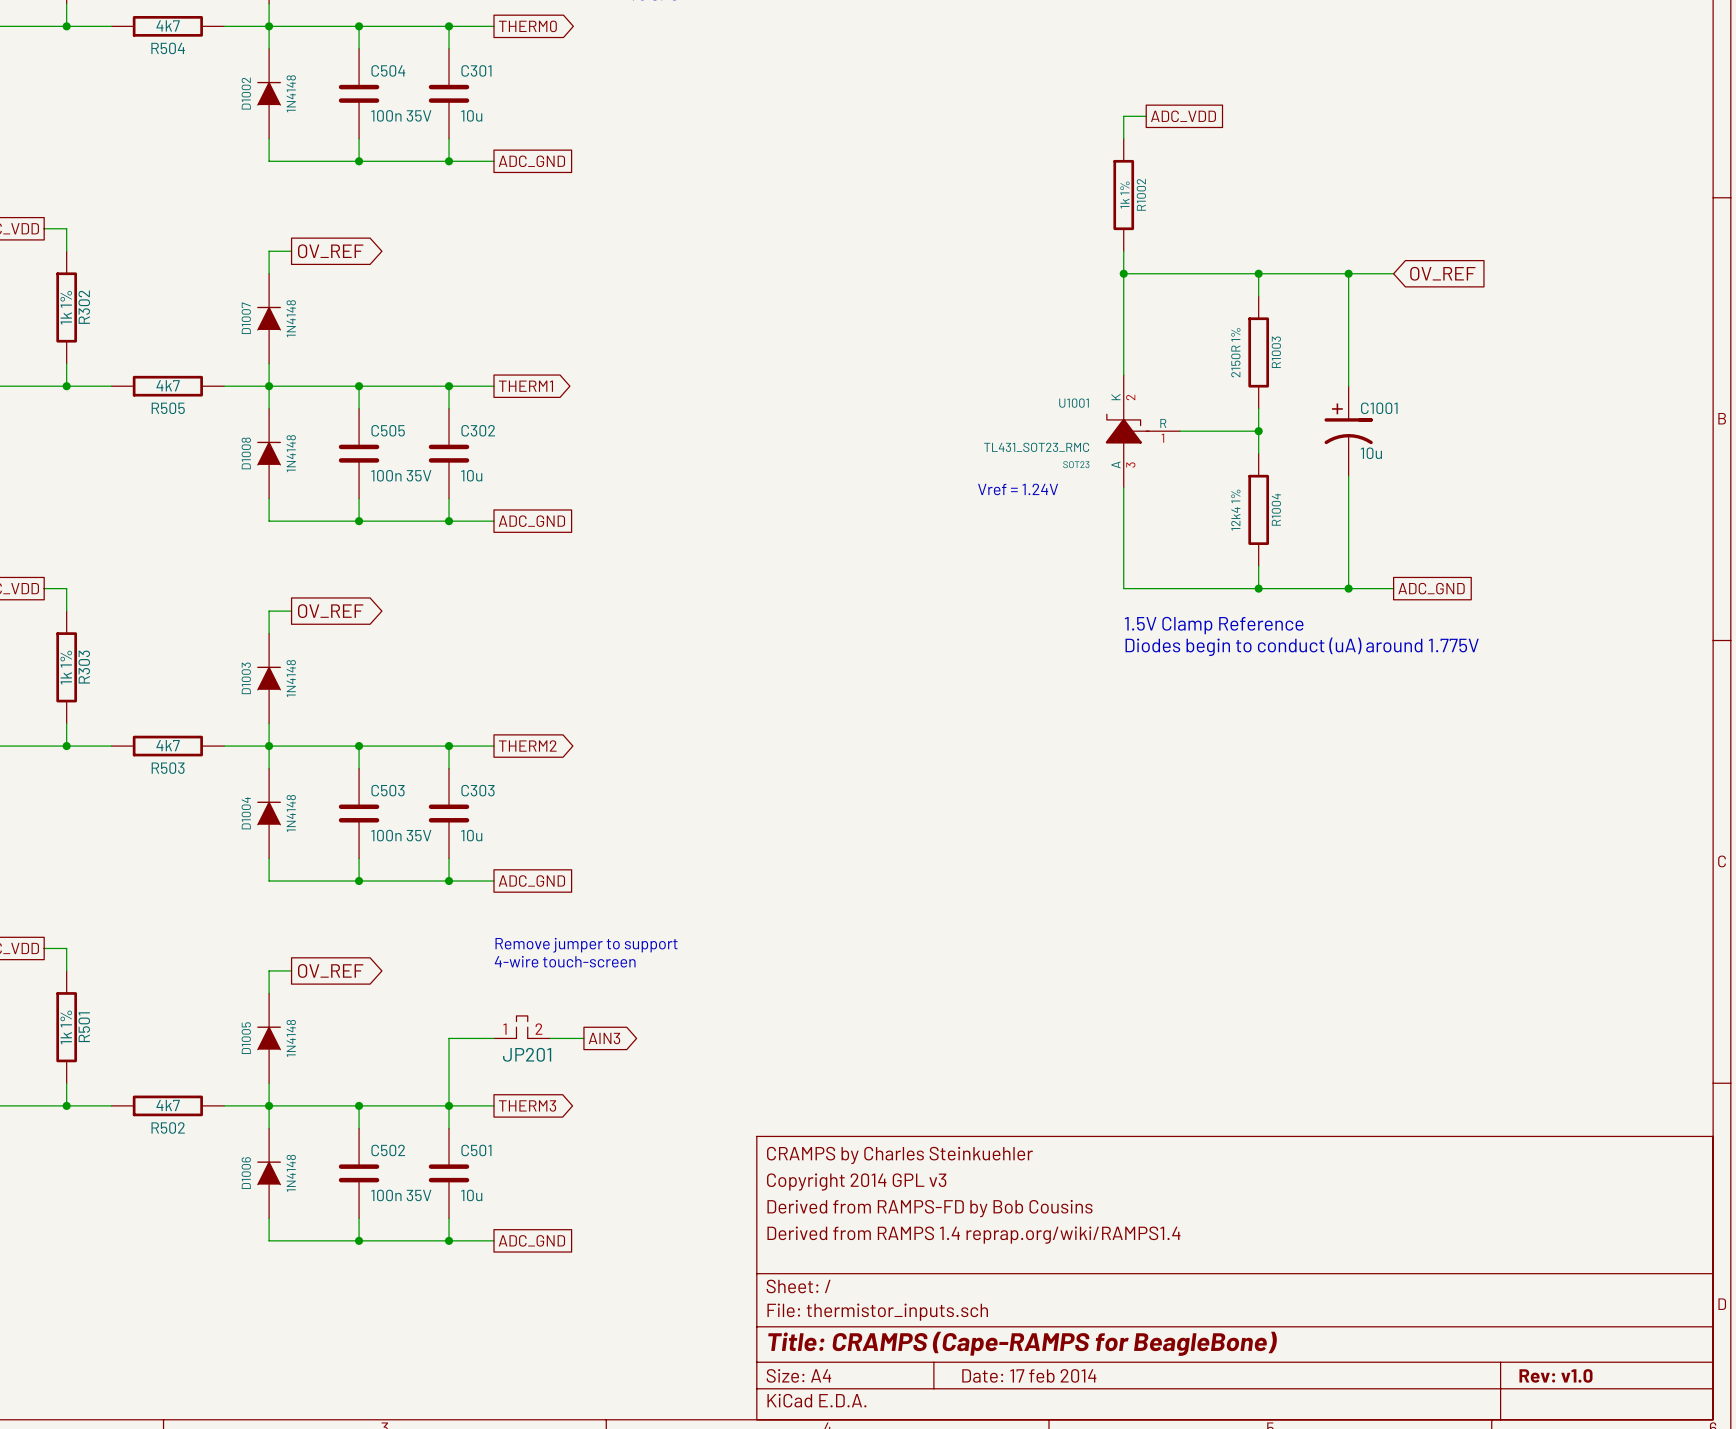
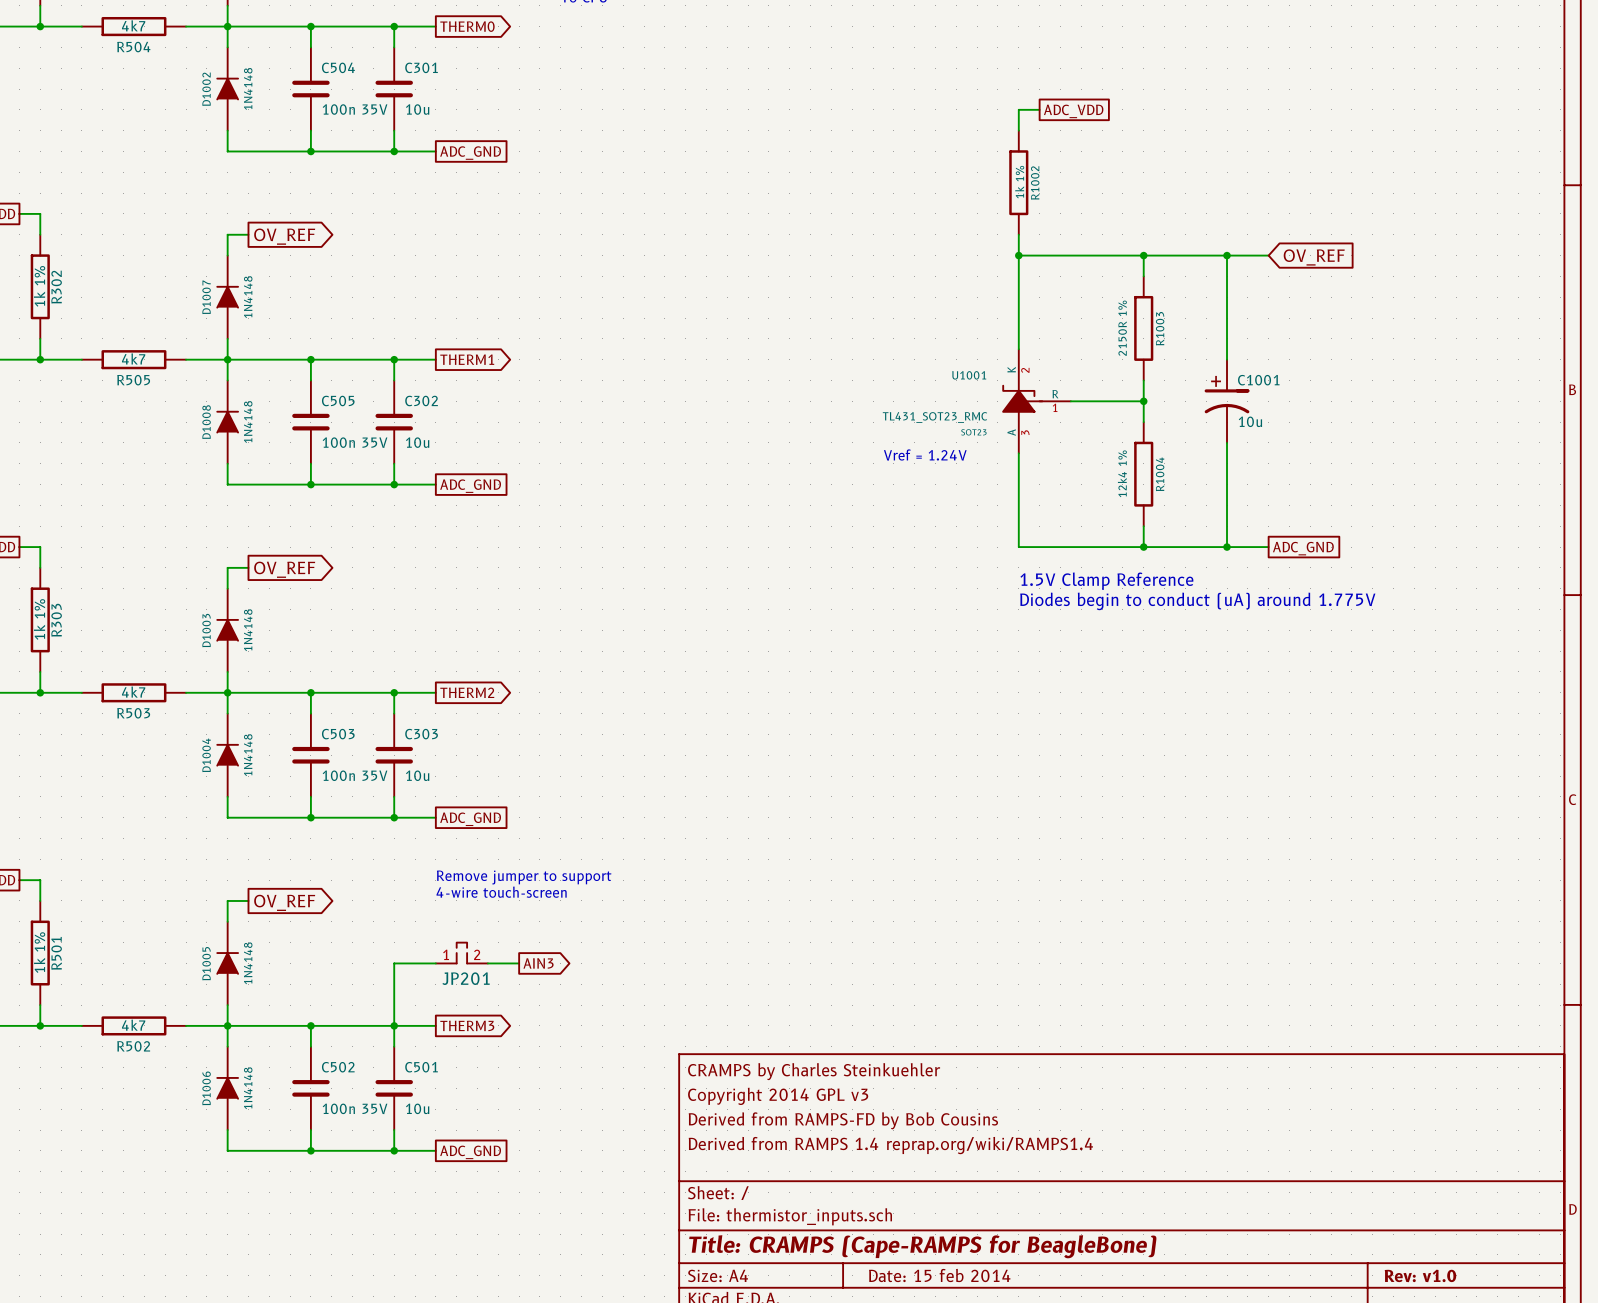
title block: Date: 17 feb 2014 (1029, 1375) -> Date: 15 feb 2014 (939, 1275)

